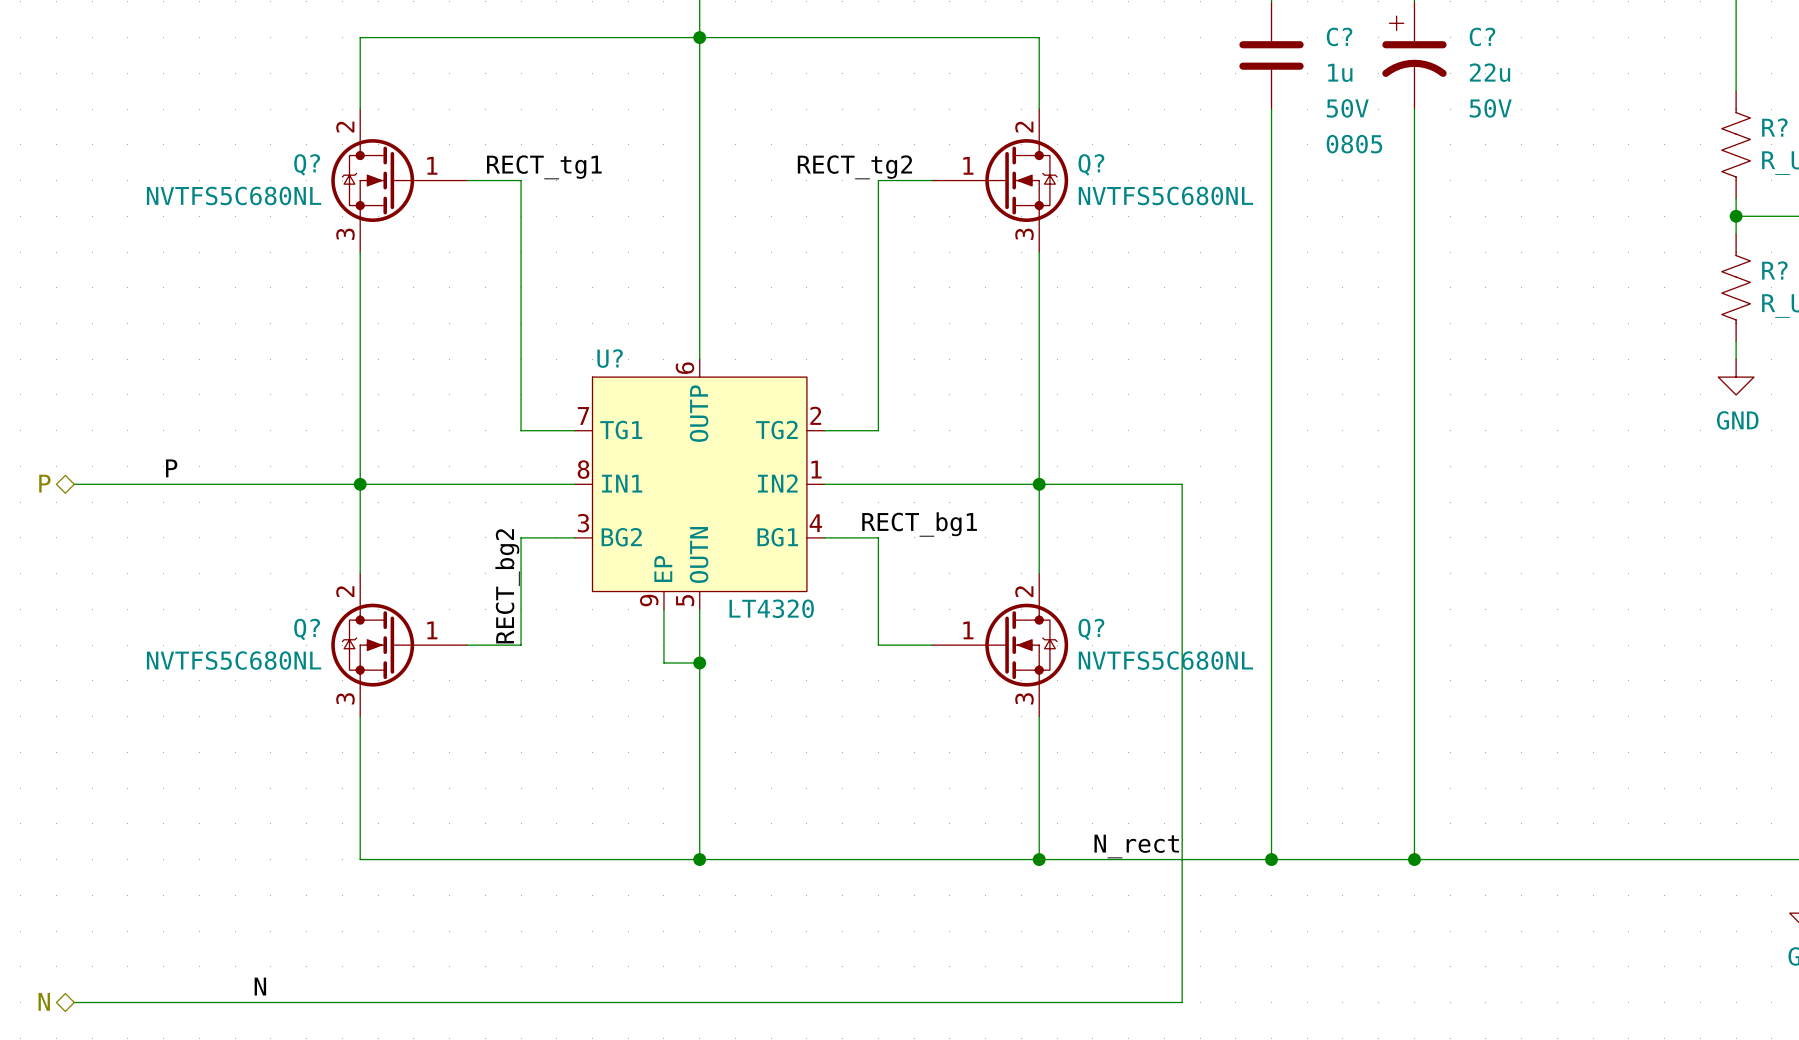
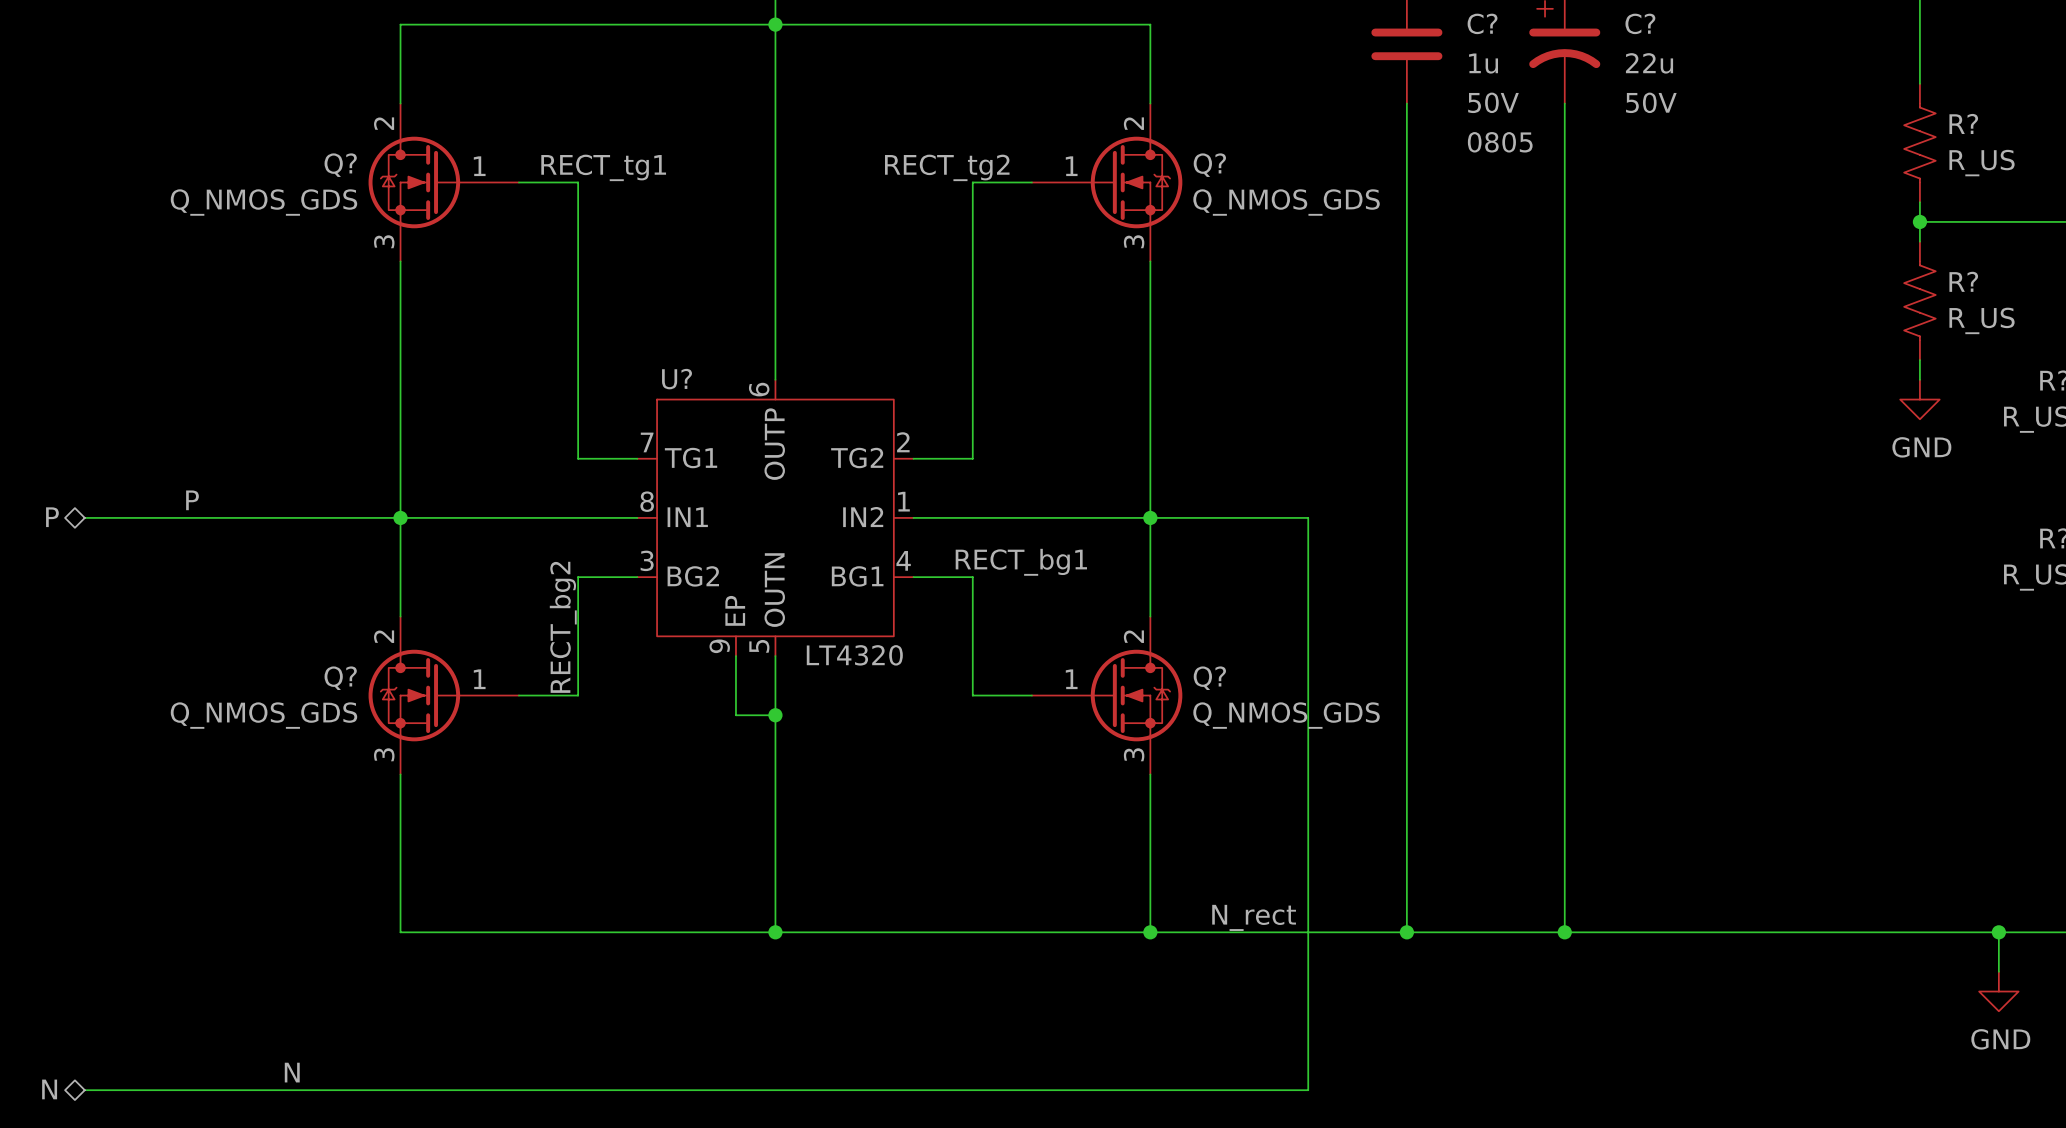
Q? value: NVTFS5C680NL (234, 195) -> Q_NMOS_GDS (263, 202)
Q? value: NVTFS5C680NL (1165, 195) -> Q_NMOS_GDS (1286, 202)
Q? value: NVTFS5C680NL (234, 660) -> Q_NMOS_GDS (263, 715)
Q? value: NVTFS5C680NL (1165, 660) -> Q_NMOS_GDS (1286, 715)

